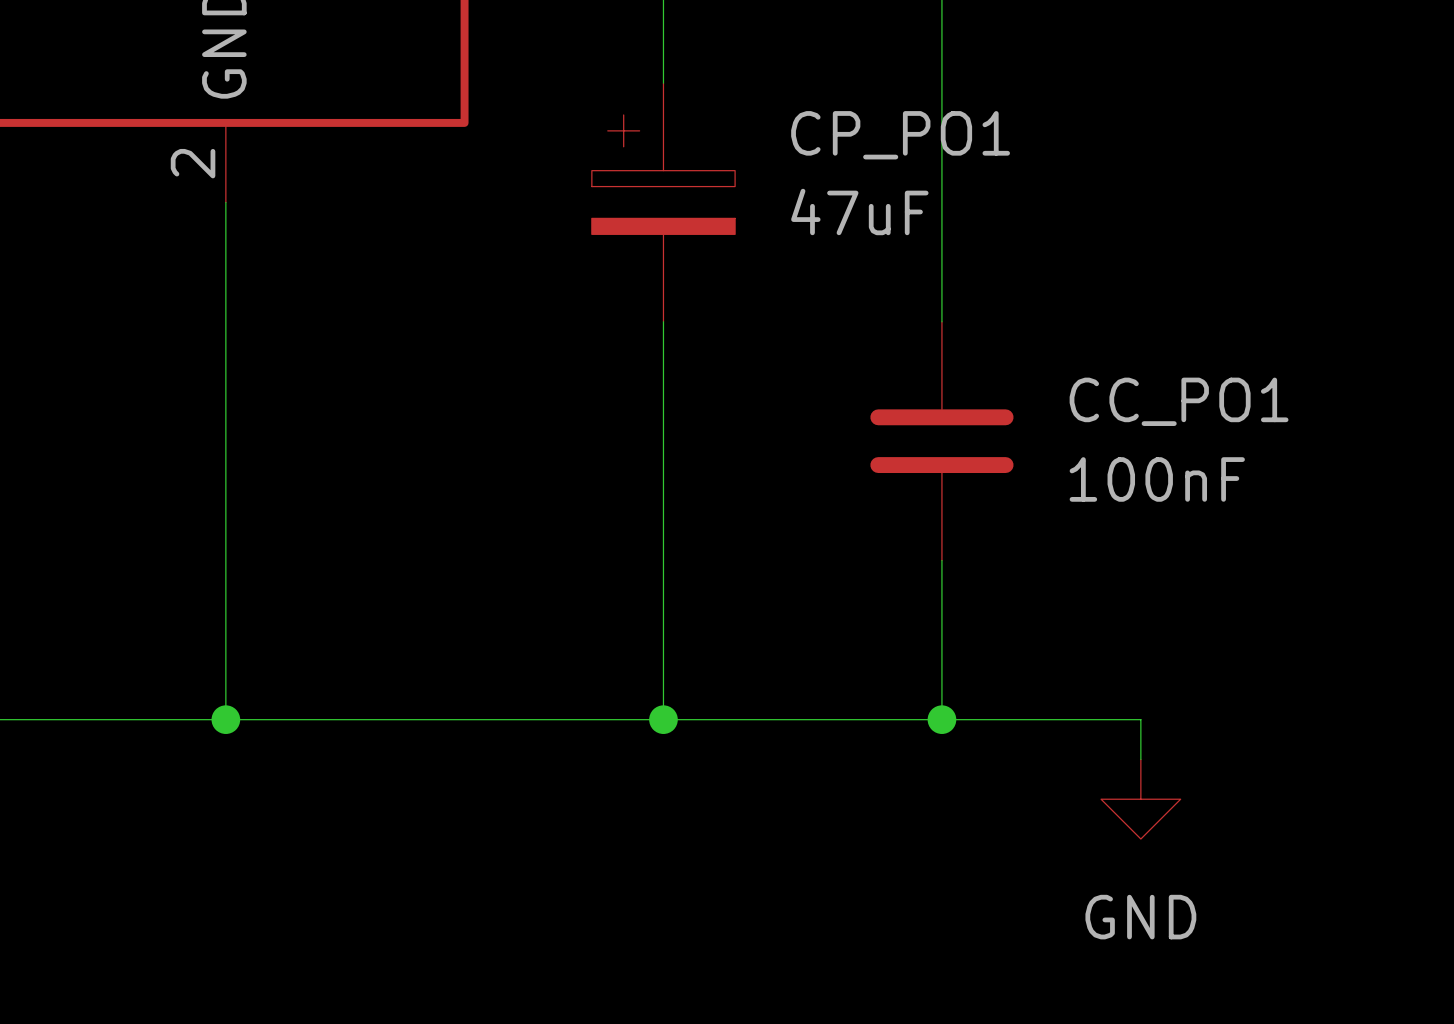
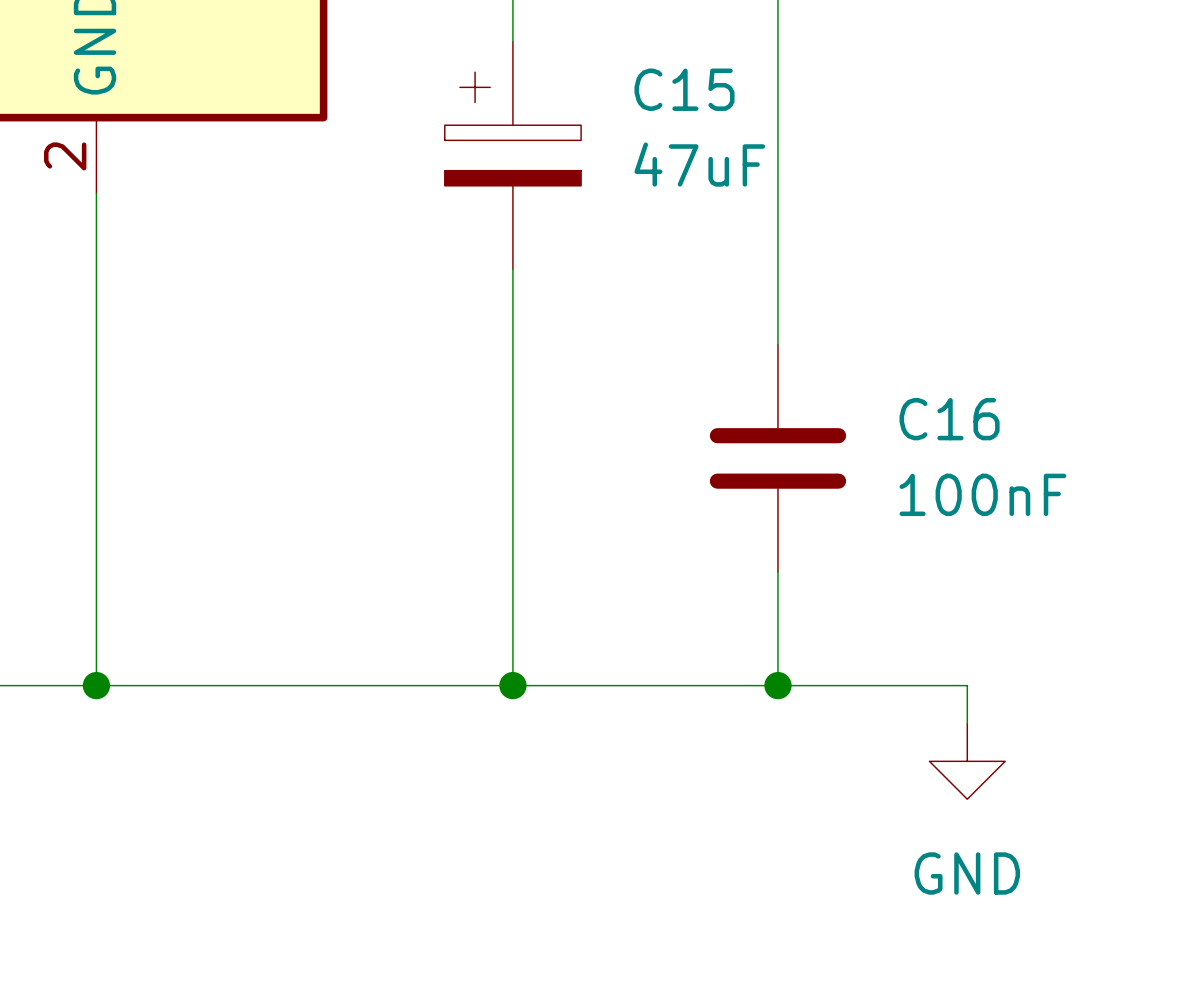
C15: none -> 47uF (512, 155)
CP_PO1: 47uF (663, 202) -> none
CC_PO1: 100nF (941, 441) -> none
C16: none -> 100nF (777, 458)

